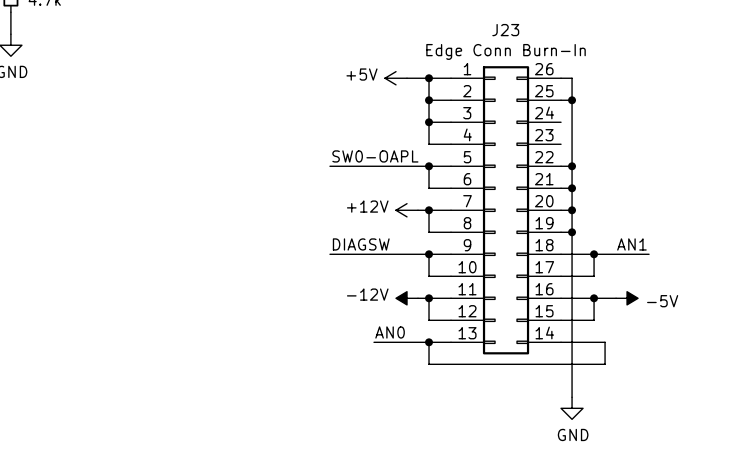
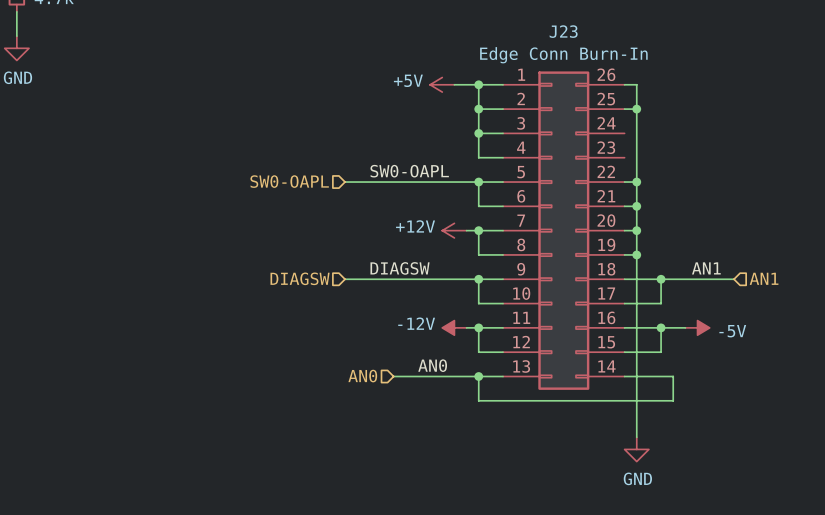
hierarchical label: none -> SW0-OAPL (289, 181)
wire: none -> (345, 182) (369, 182)
hierarchical label: none -> DIAGSW (300, 278)
hierarchical label: none -> AN1 (764, 278)
wire: none -> (345, 279) (369, 279)
wire: none -> (721, 279) (733, 279)
hierarchical label: none -> AN0 (362, 376)
wire: none -> (393, 376) (417, 376)

